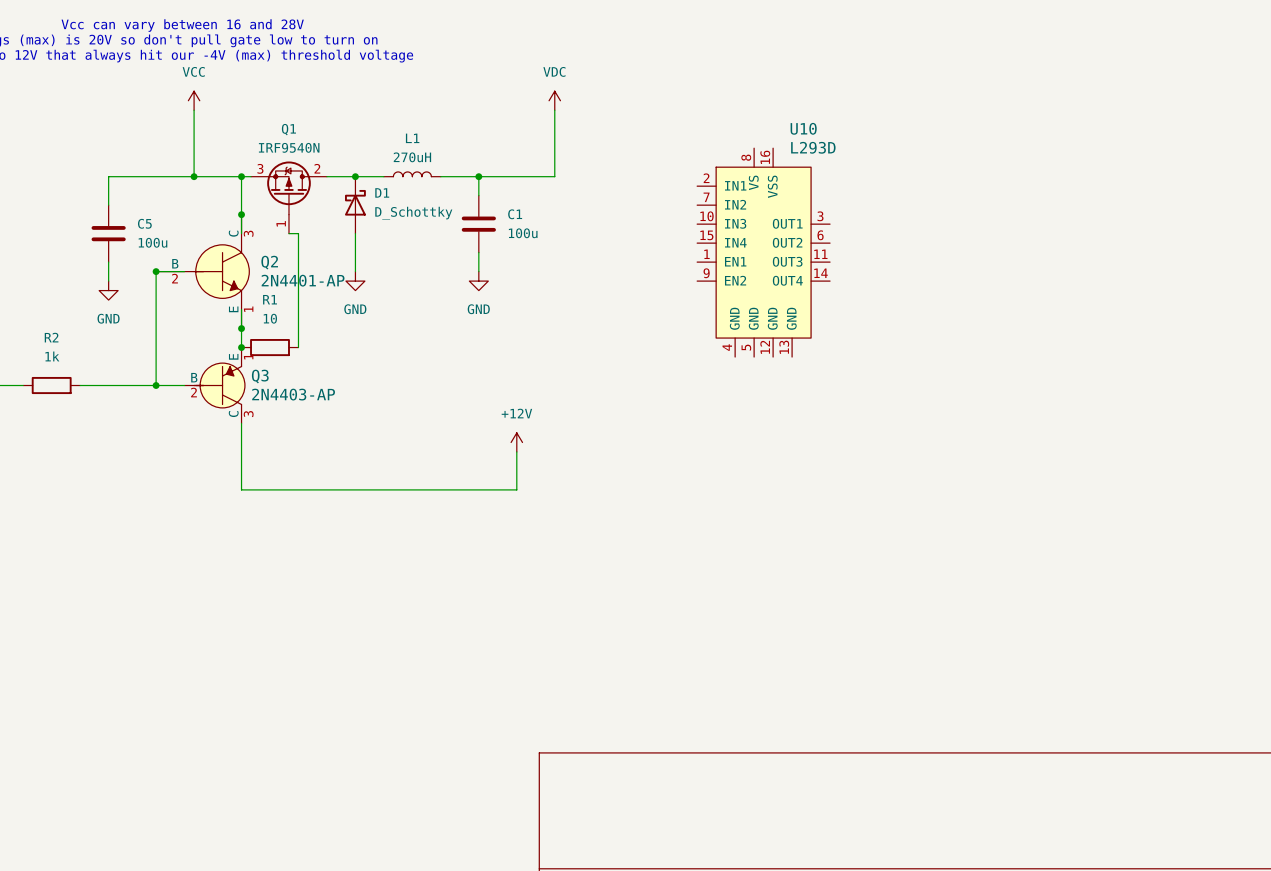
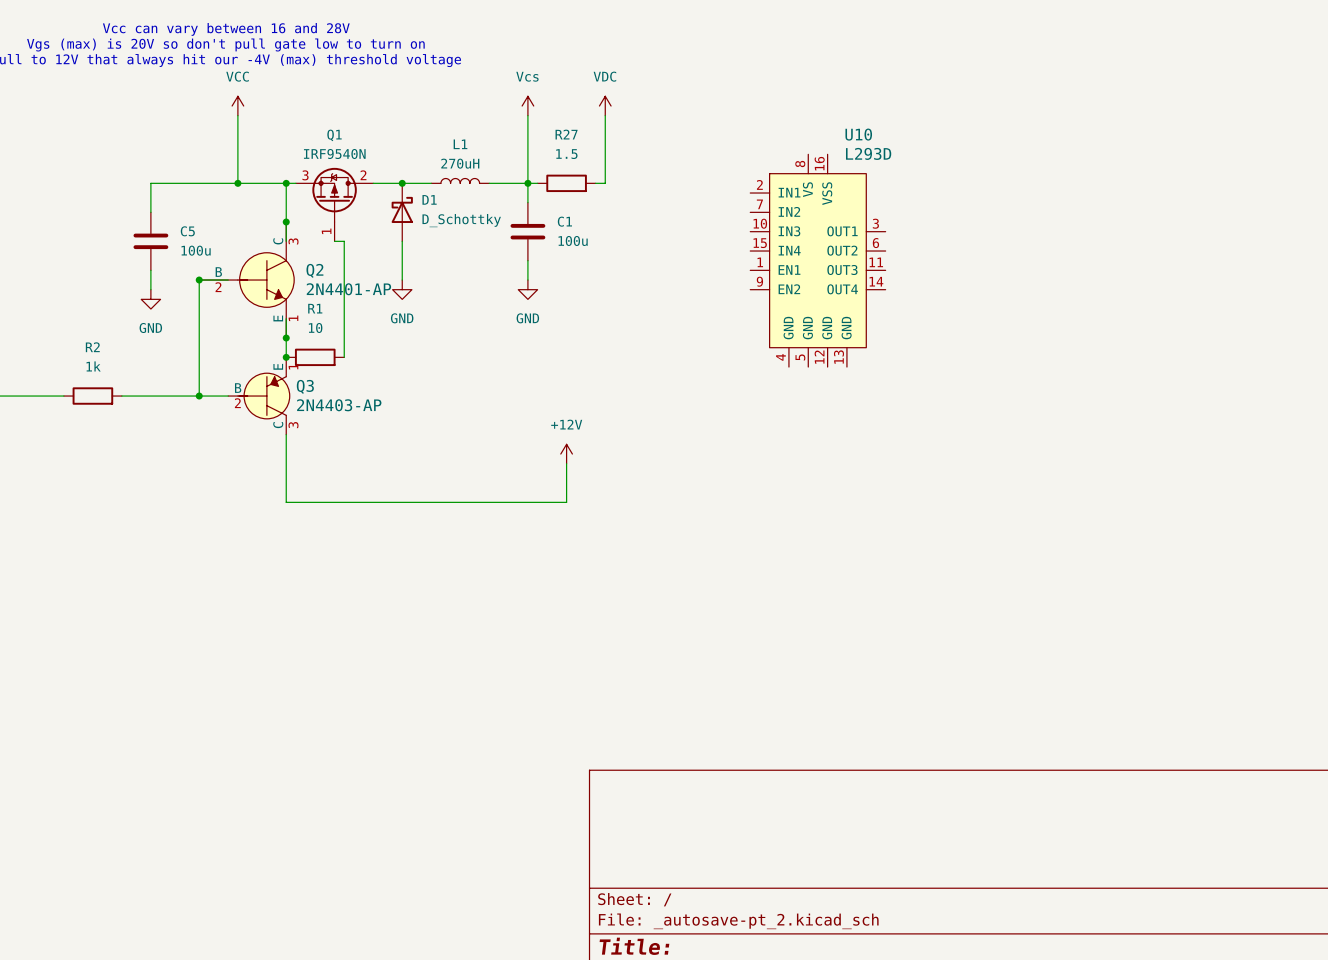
power symbol: none -> Vcs (527, 106)
wire: none -> (527, 115) (527, 183)
wire: (488, 176) (545, 176) -> none
R27: none -> 1.5 (566, 183)

